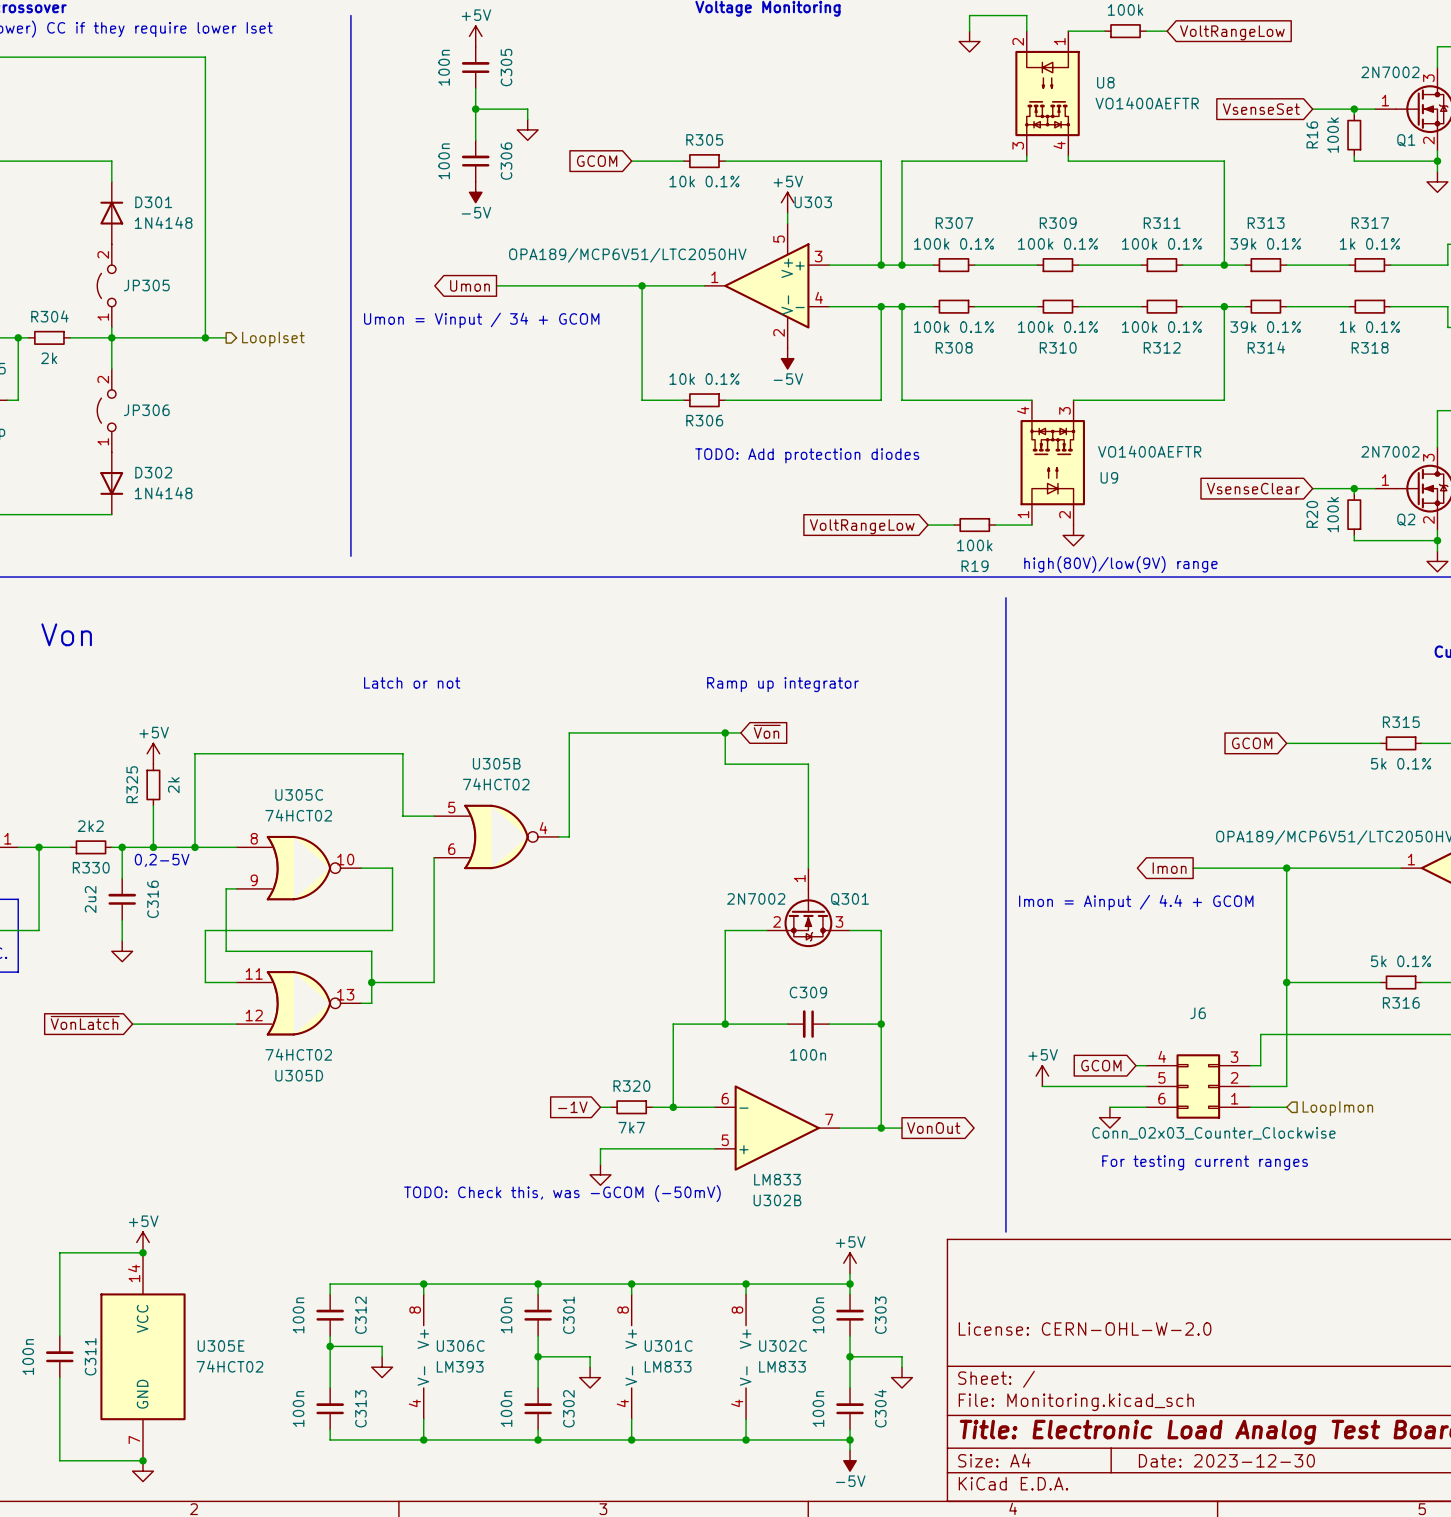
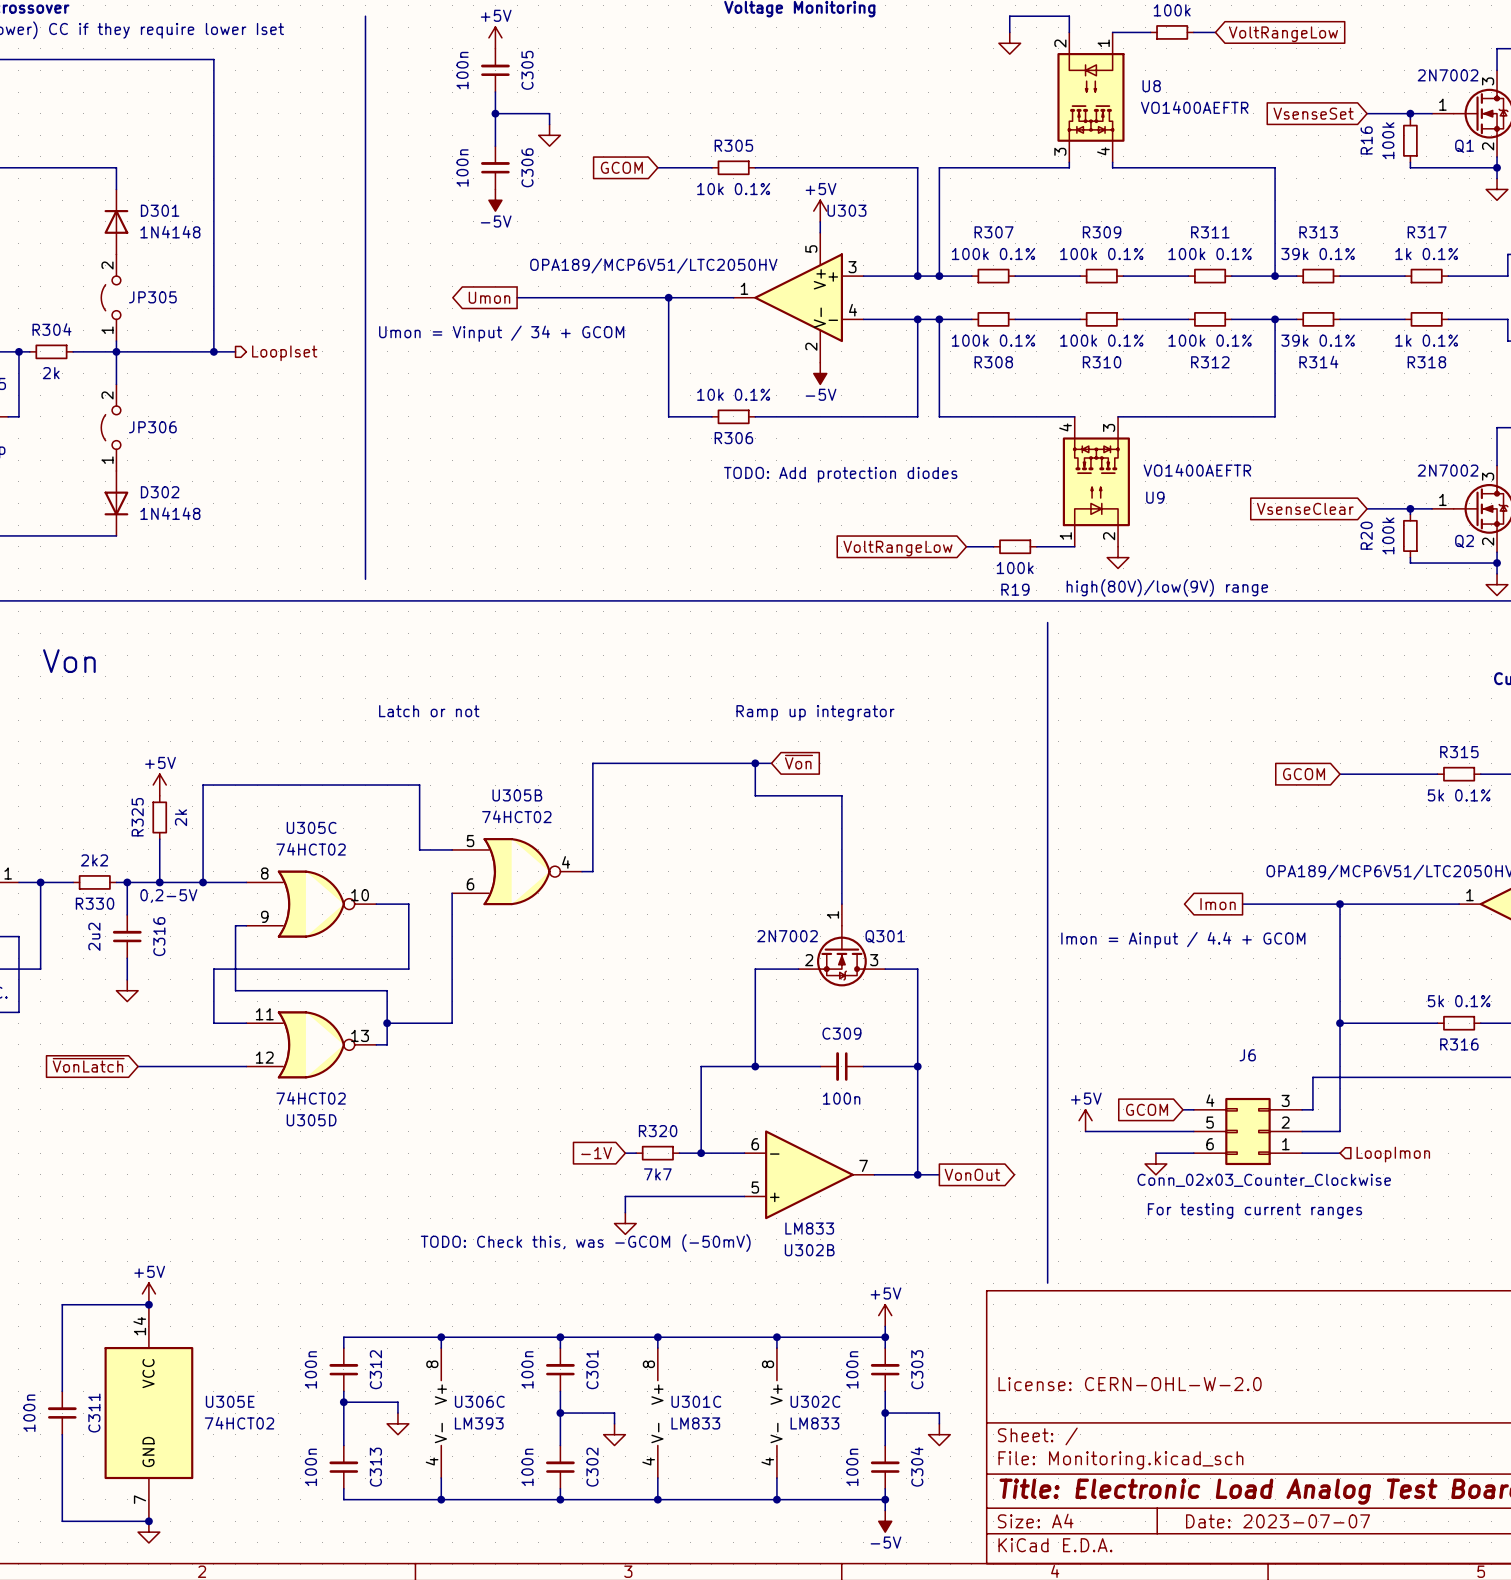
title block: Date: 2023-12-30 (1226, 1460) -> Date: 2023-07-07 (1278, 1521)

